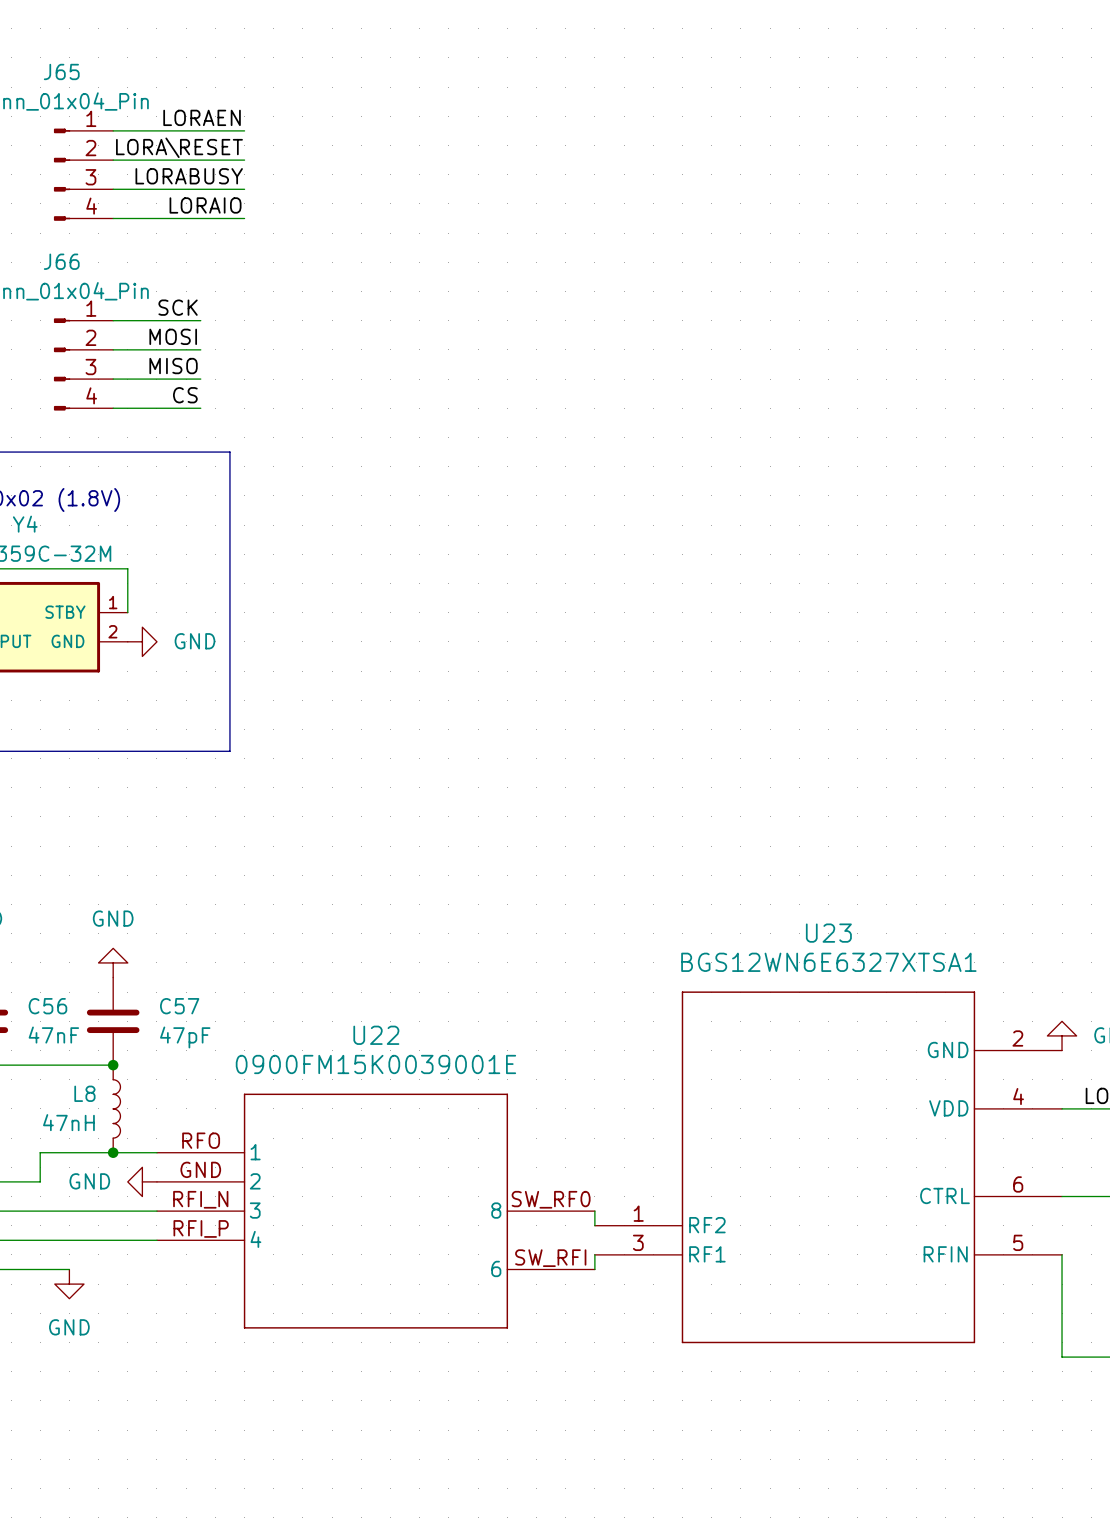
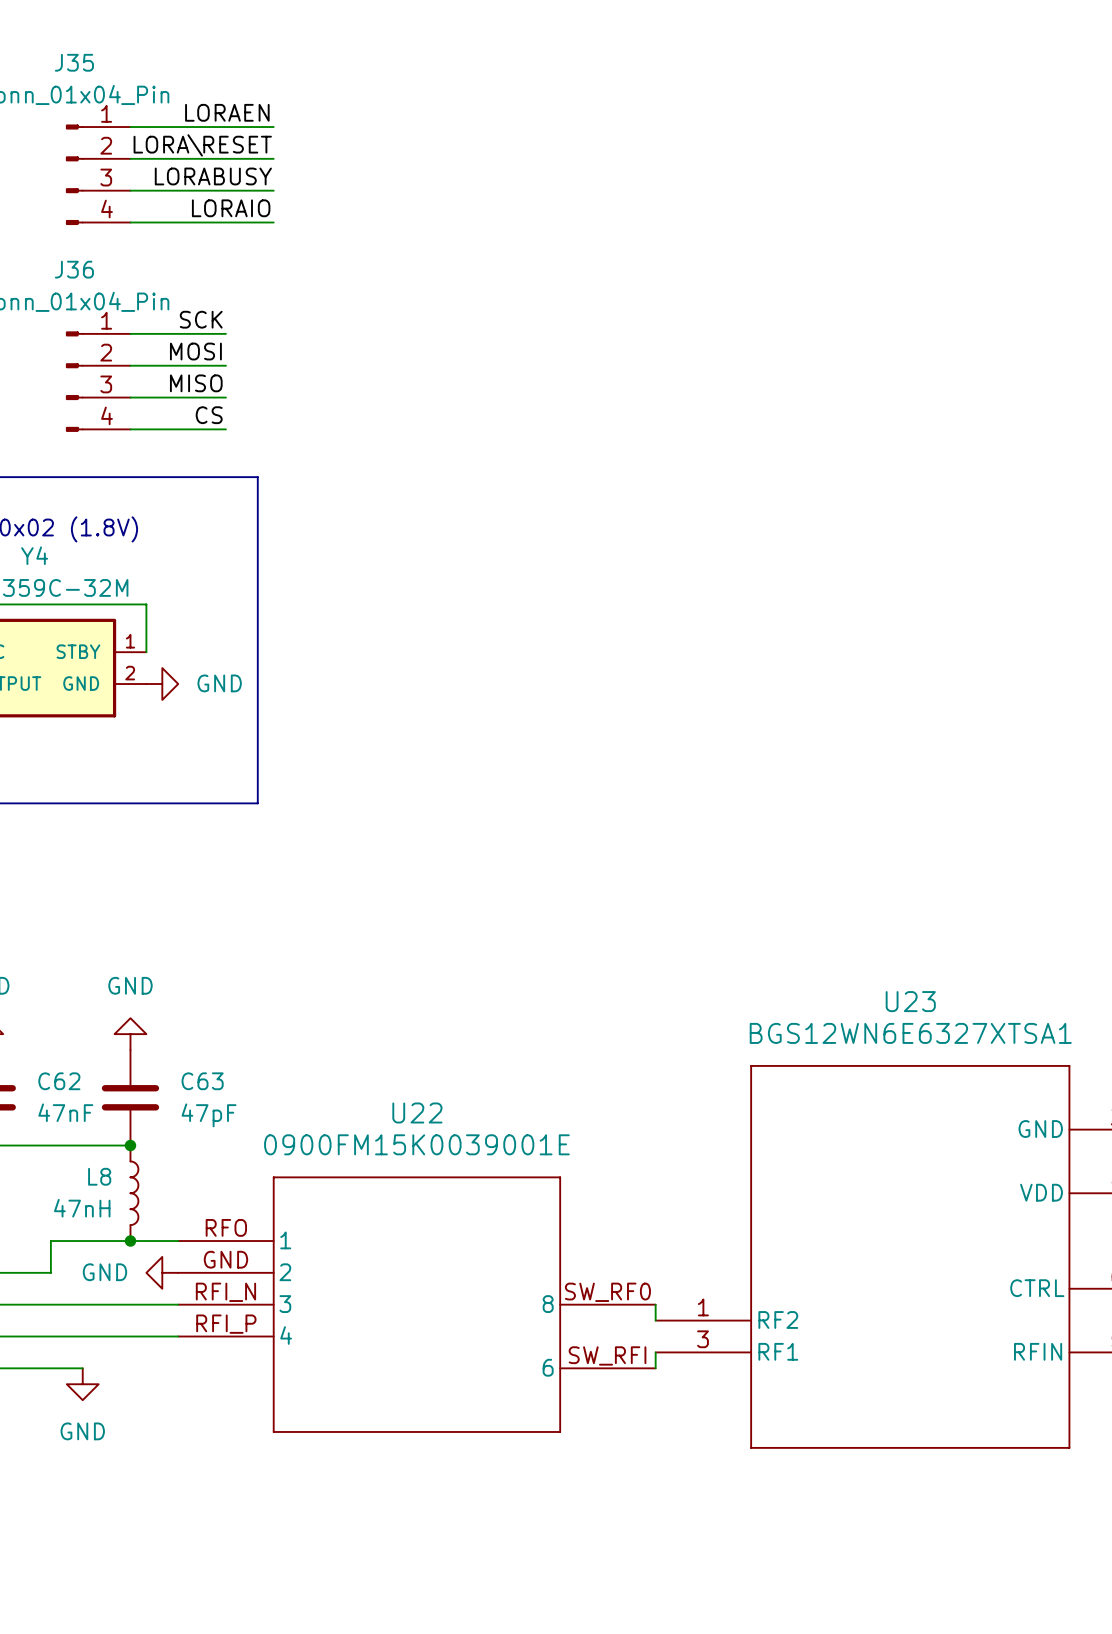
J65 name: J65 (61, 71) -> J35 (74, 62)
J66 name: J66 (61, 261) -> J36 (74, 269)
C56 name: C56 (47, 1006) -> C62 (59, 1081)
C57 name: C57 (179, 1006) -> C63 (202, 1081)

